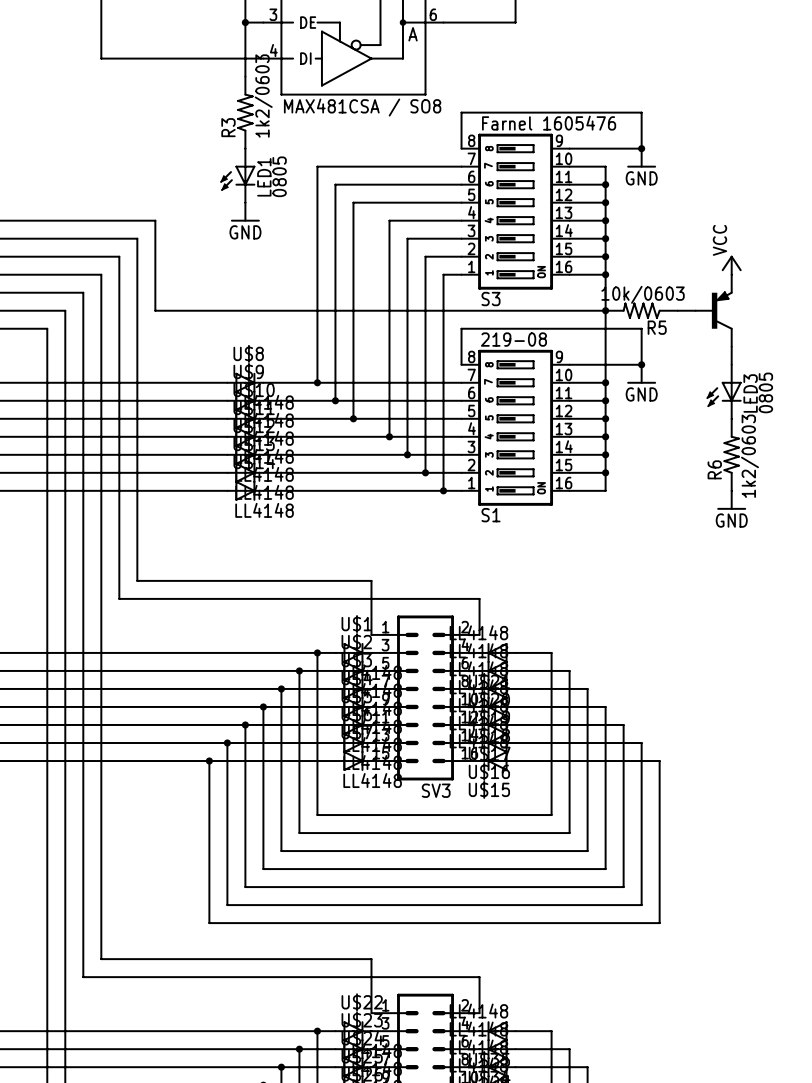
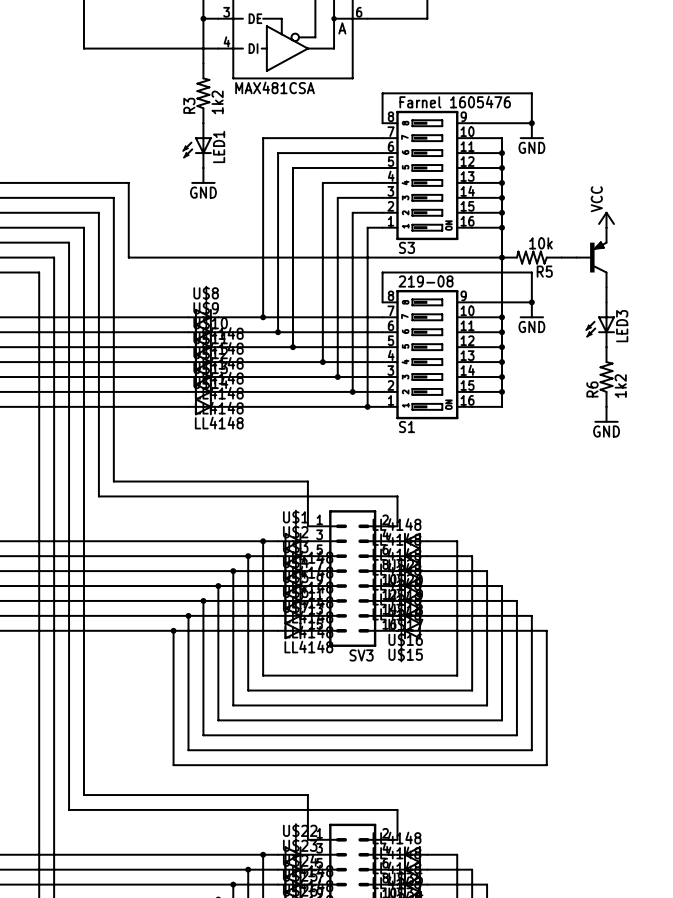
R3 value: 1k2/0603 (263, 96) -> 1k2 (217, 102)
part value: MAX481CSA / SO8 (362, 107) -> MAX481CSA (275, 87)
LED1 value: 0805 (279, 176) -> none
R5 value: 10k/0603 (643, 294) -> 10k (540, 243)
LED3 value: 0805 (765, 392) -> none
R6 value: 1k2/0603 (750, 456) -> 1k2 (620, 386)

